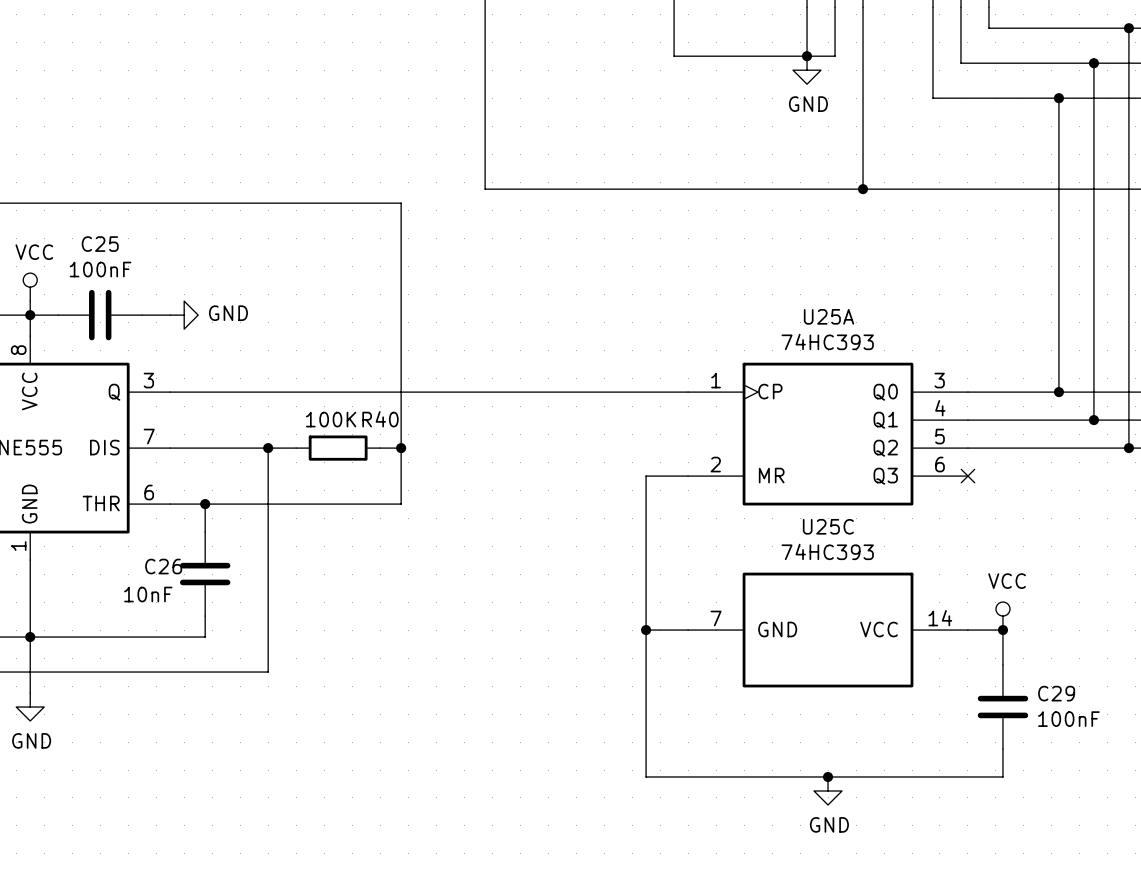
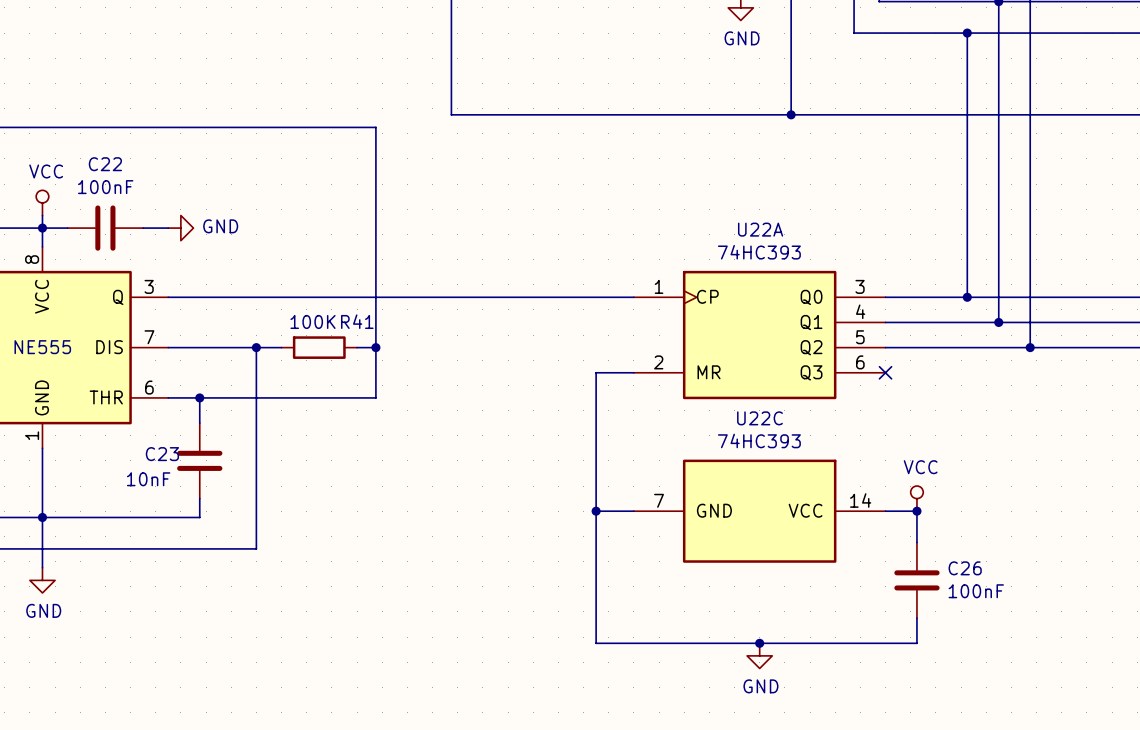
C25 name: C25 (100, 244) -> C22 (105, 164)
U25A name: U25A (829, 316) -> U22A (760, 229)
R40 name: R40 (380, 419) -> R41 (357, 321)
U25C name: U25C (828, 526) -> U22C (759, 418)
C26 name: C26 (163, 566) -> C23 (162, 454)
C29 name: C29 (1056, 693) -> C26 (965, 568)

